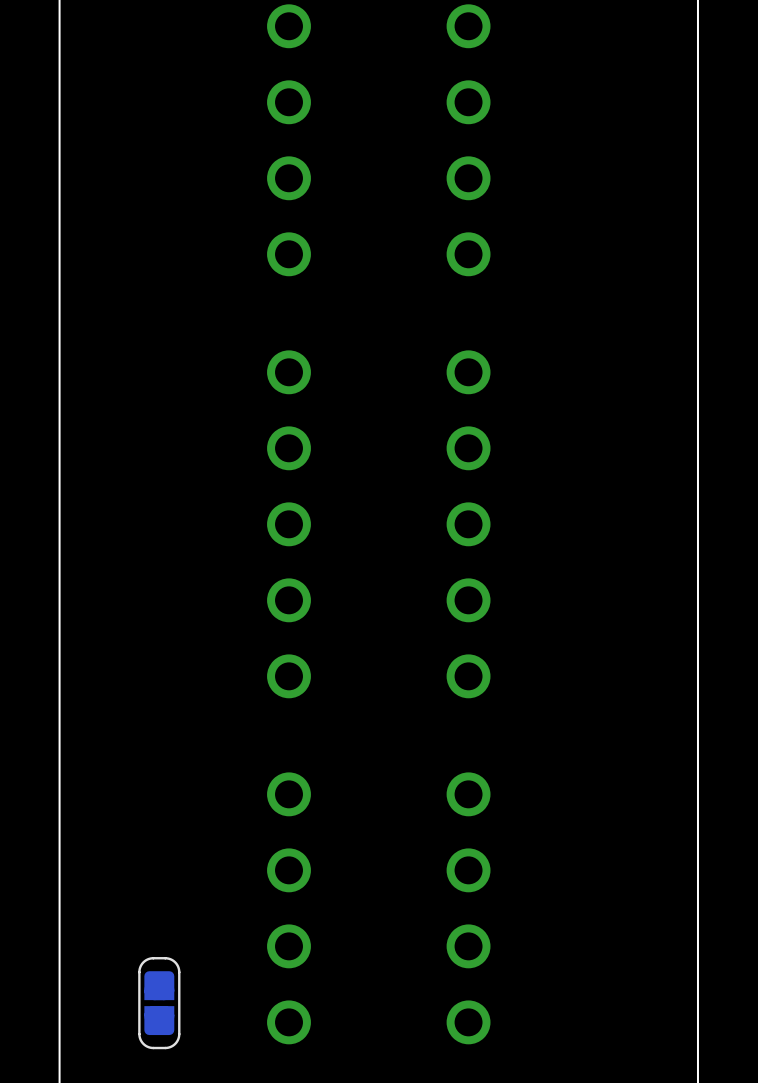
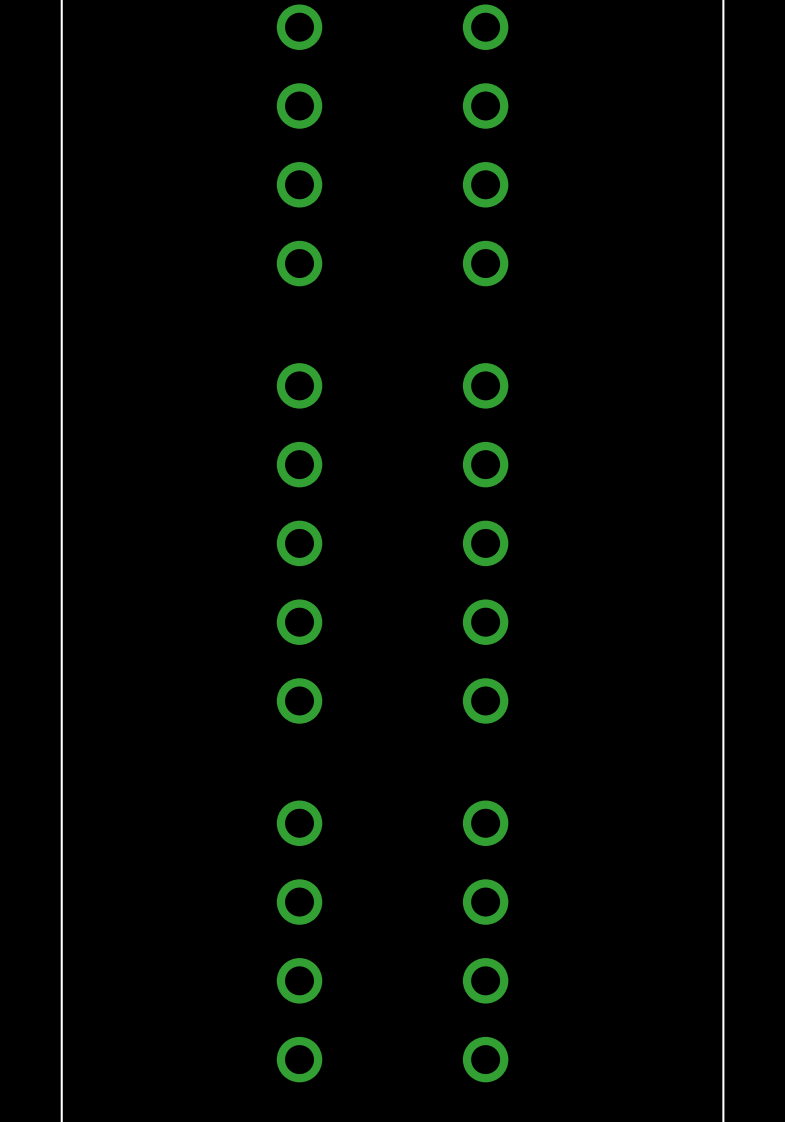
part: (159, 1003) -> none

